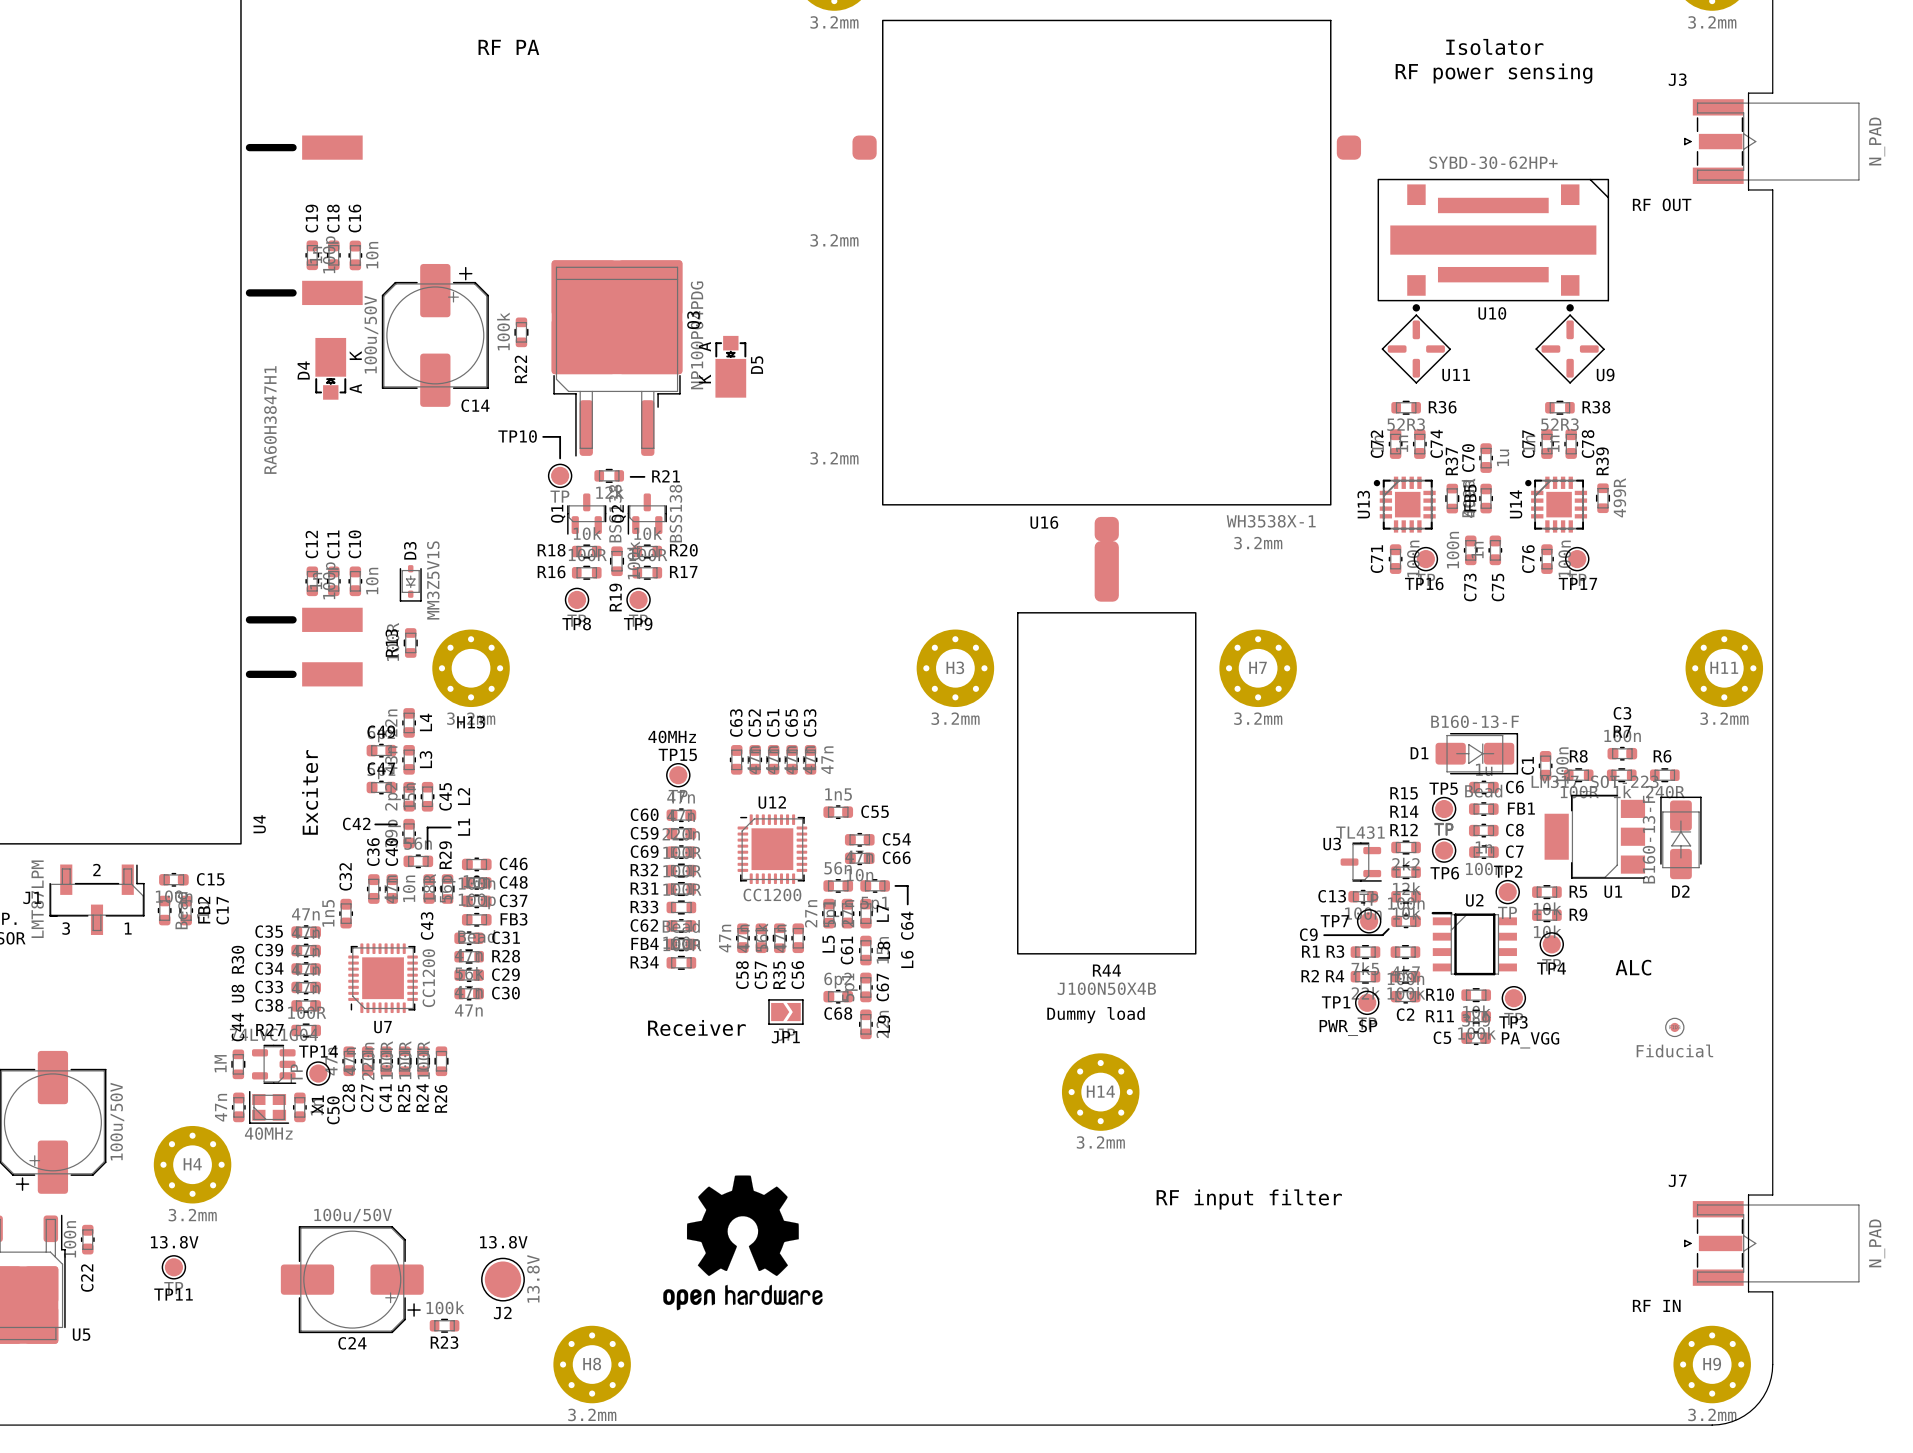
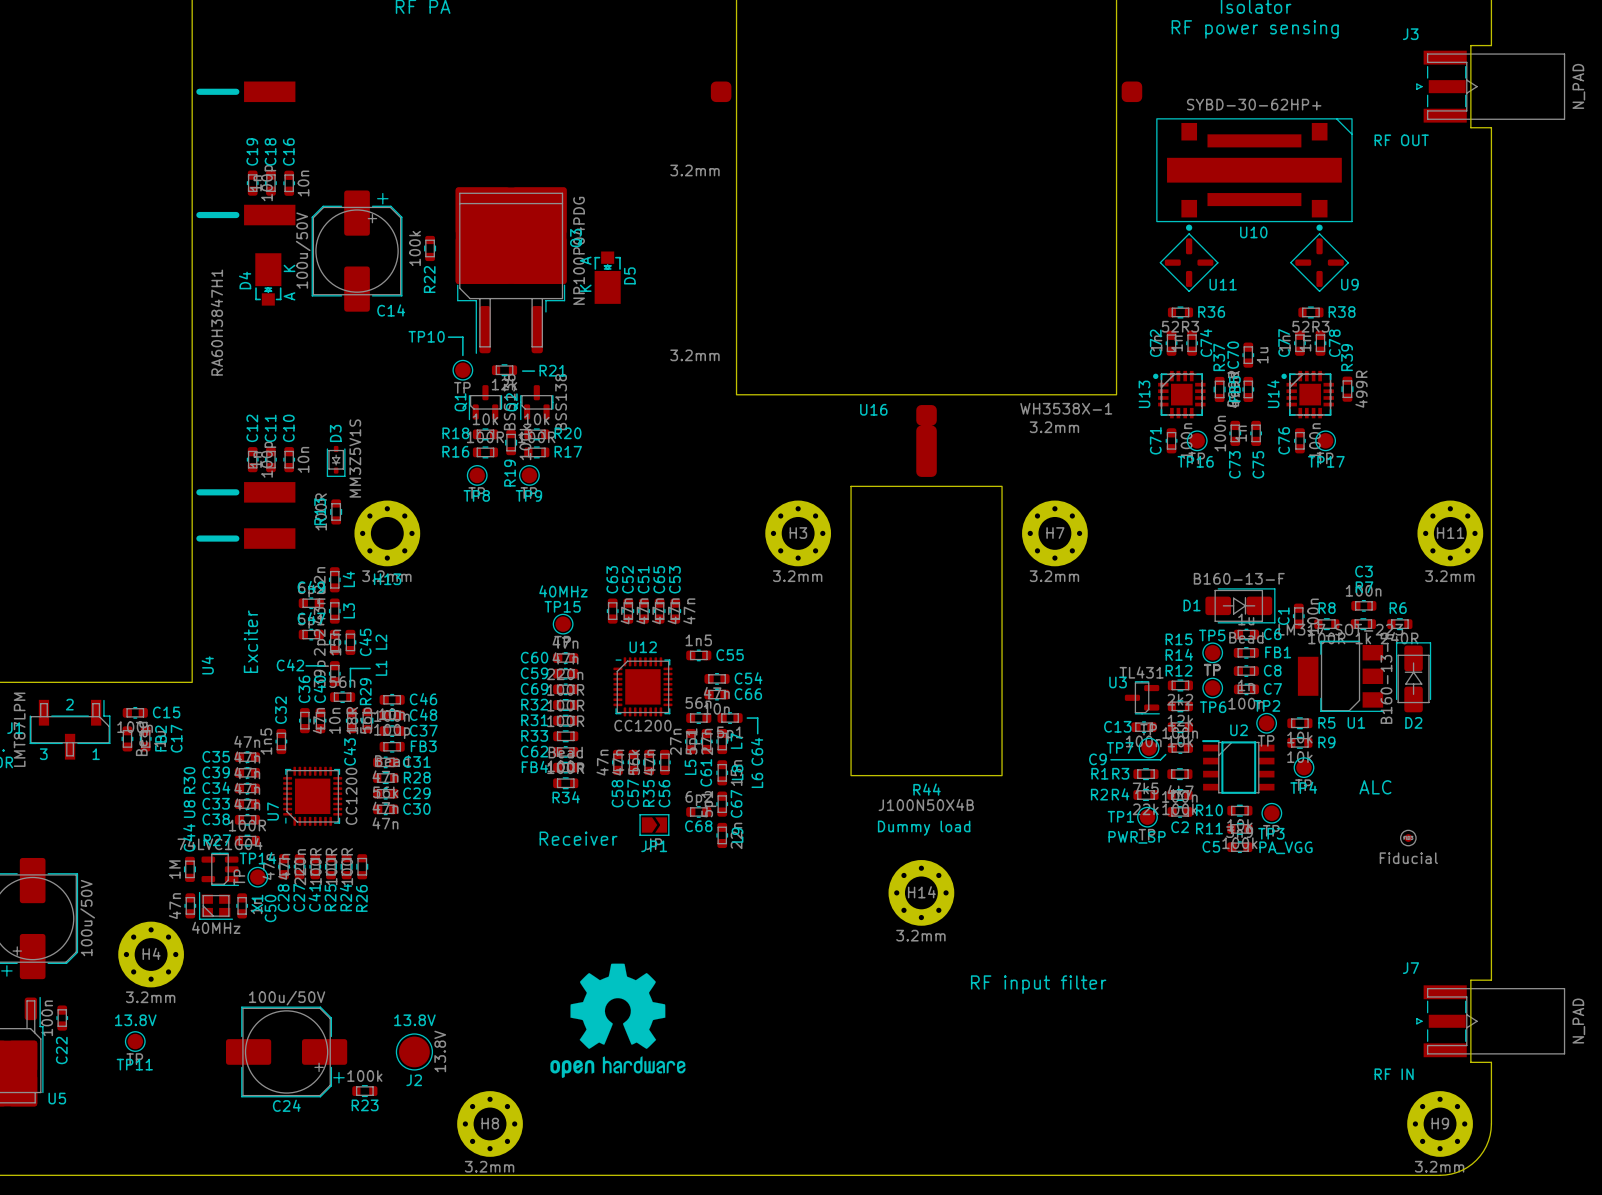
R34 name position: R34 (644, 962) -> R34 (566, 797)
U7 name rotation: 0° (383, 1027) -> 90° counterclockwise (273, 811)
U7 name position: U7 (383, 1027) -> U7 (273, 811)

